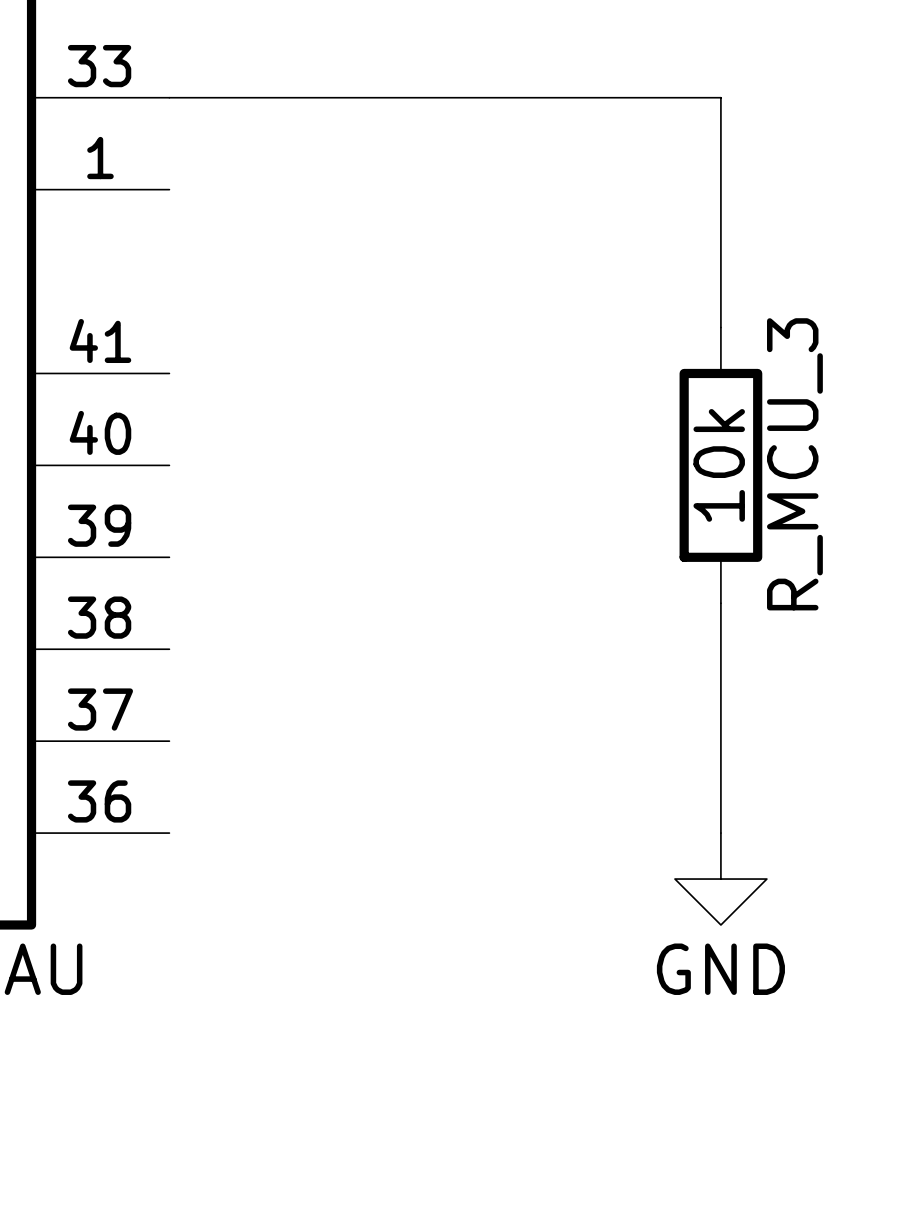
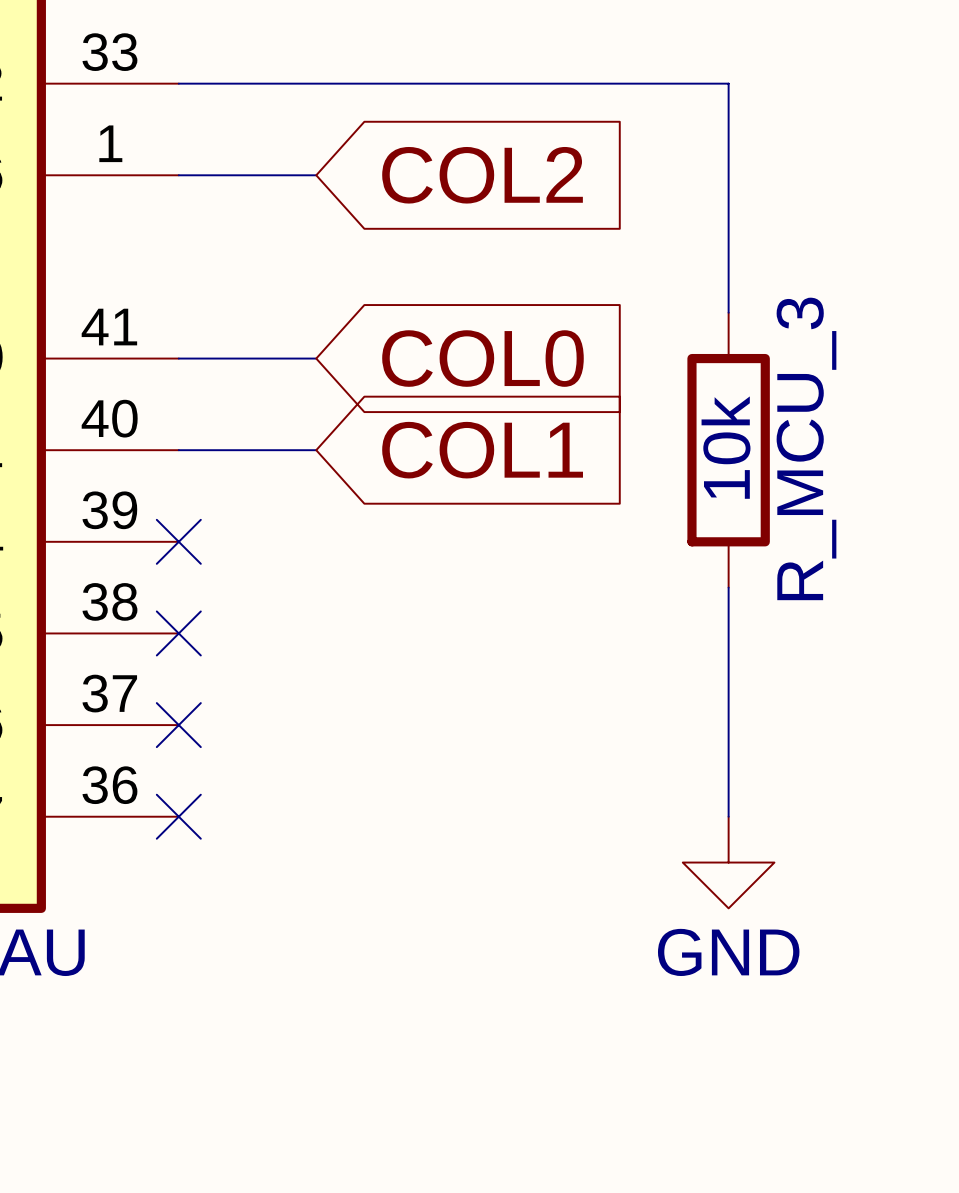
wire: none -> (178, 175) (316, 175)
global label: none -> COL2 (482, 175)
wire: none -> (178, 358) (316, 358)
global label: none -> COL0 (482, 358)
wire: none -> (178, 450) (316, 450)
global label: none -> COL1 (482, 450)
no-connect mark: none -> (178, 541)
no-connect mark: none -> (178, 633)
no-connect mark: none -> (178, 725)
no-connect mark: none -> (178, 816)

